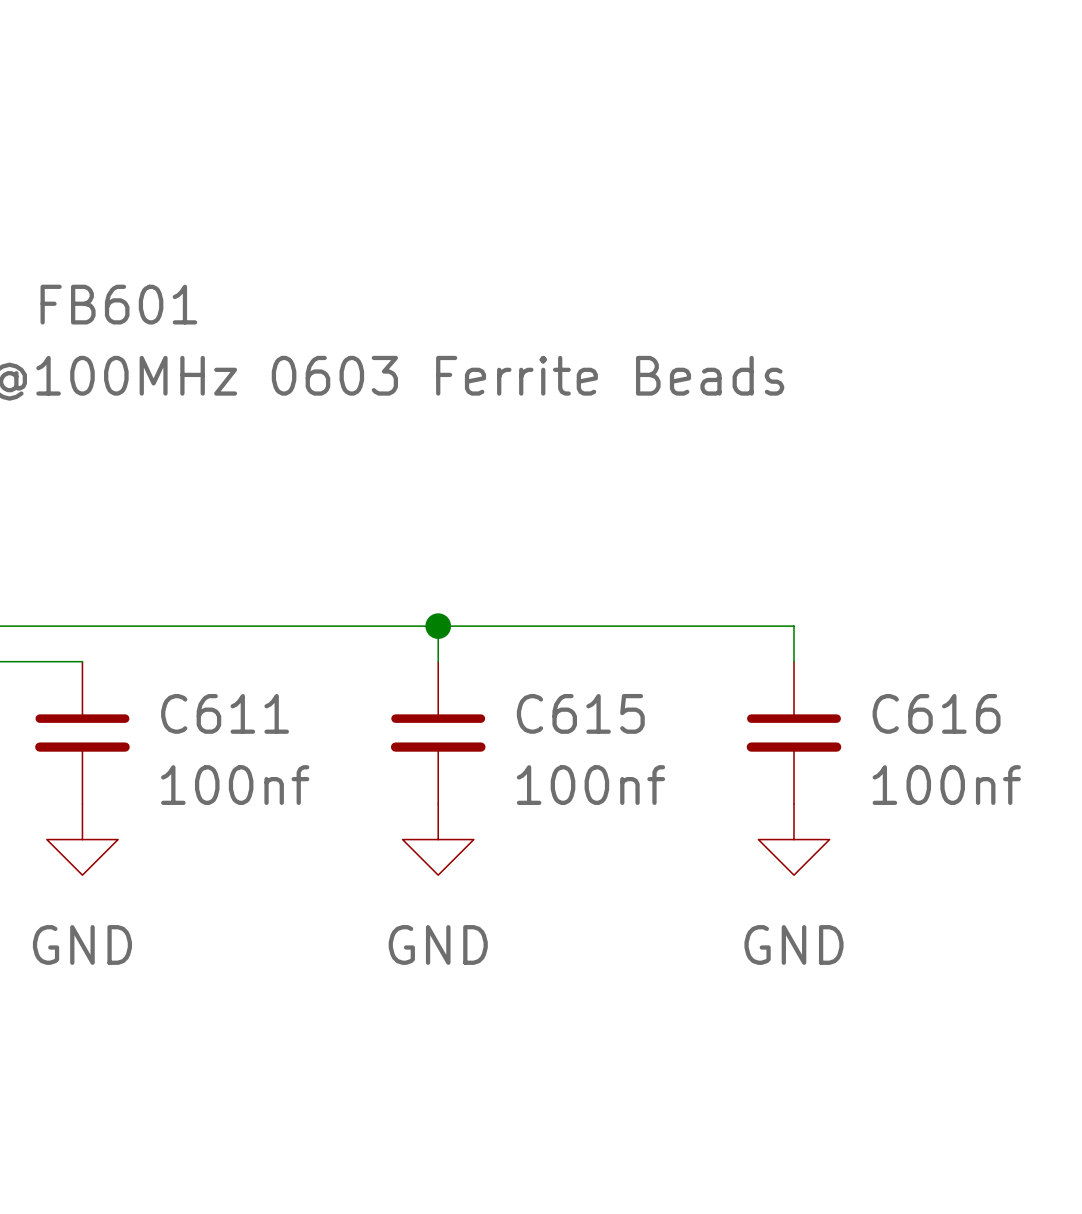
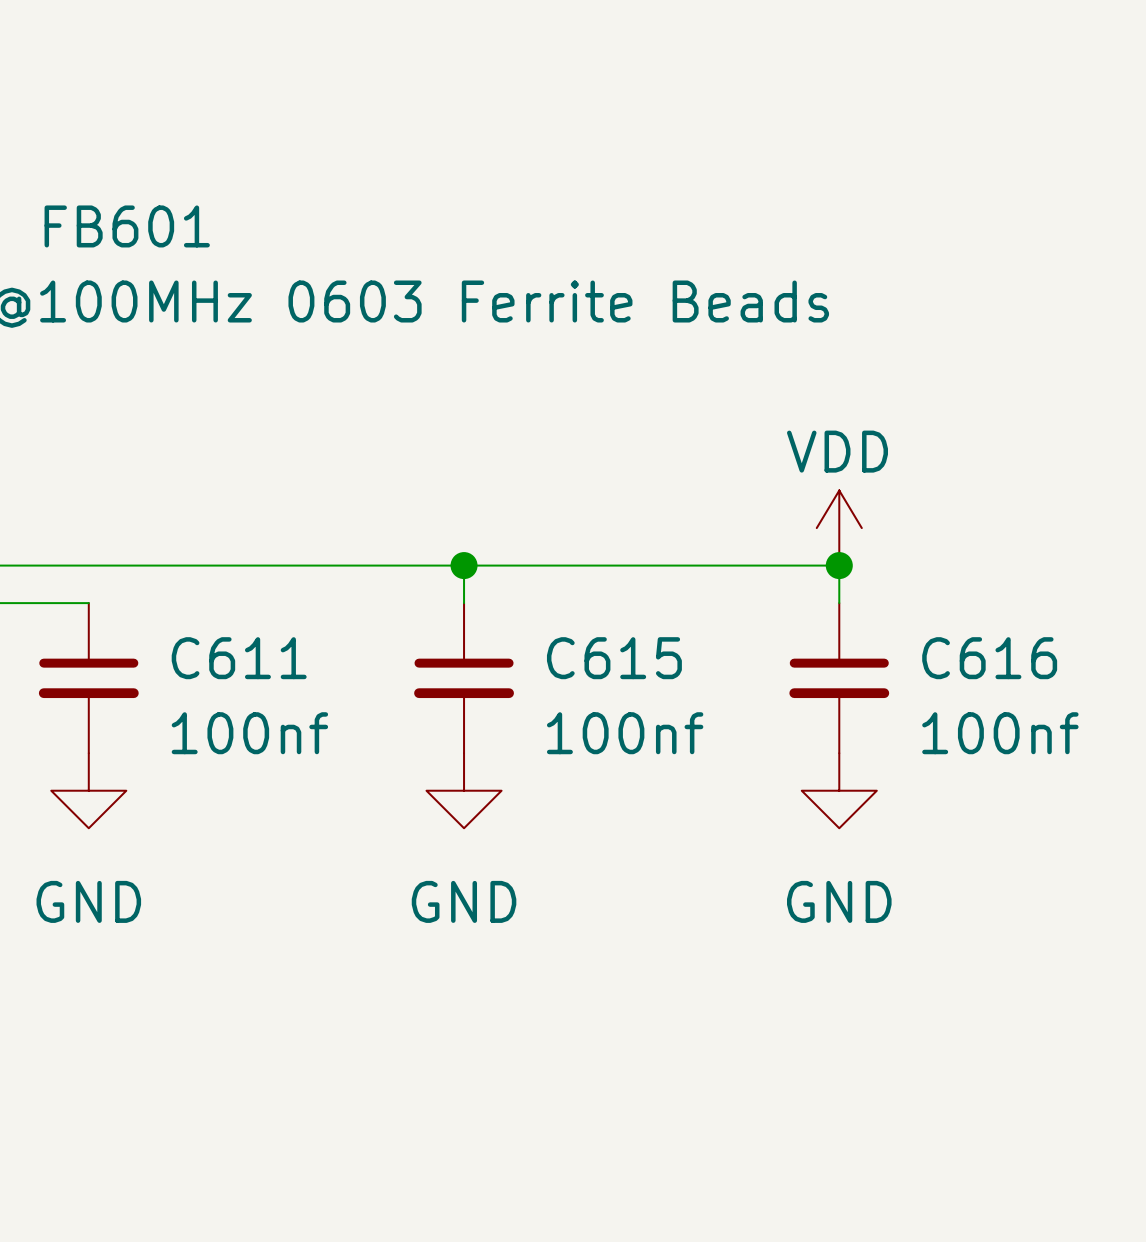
power symbol: none -> VDD (839, 528)
junction: none -> (839, 565)

